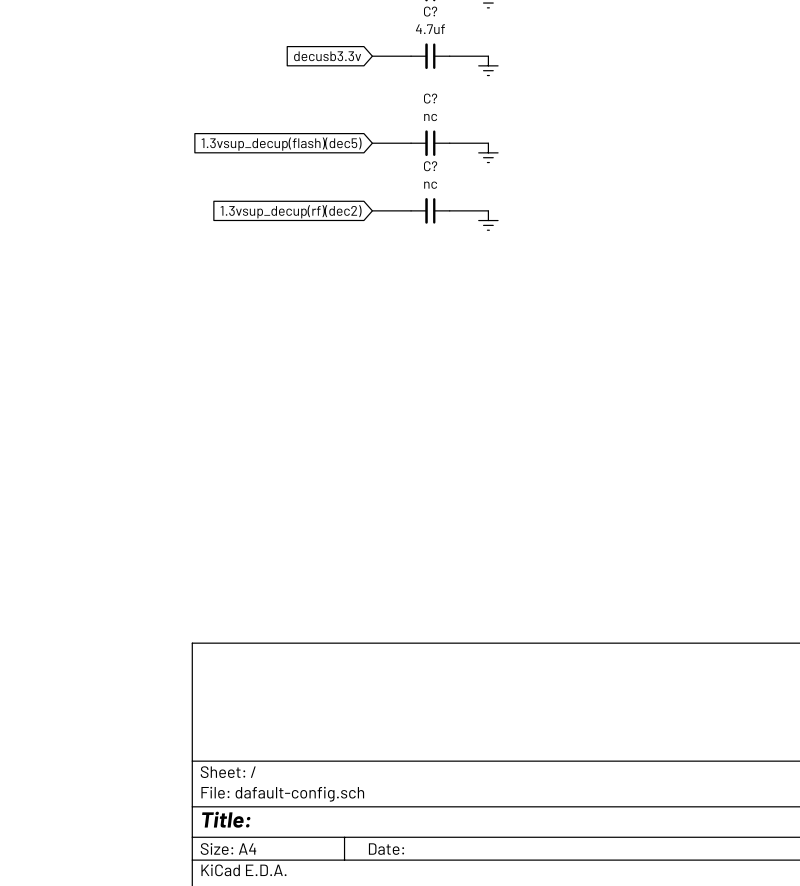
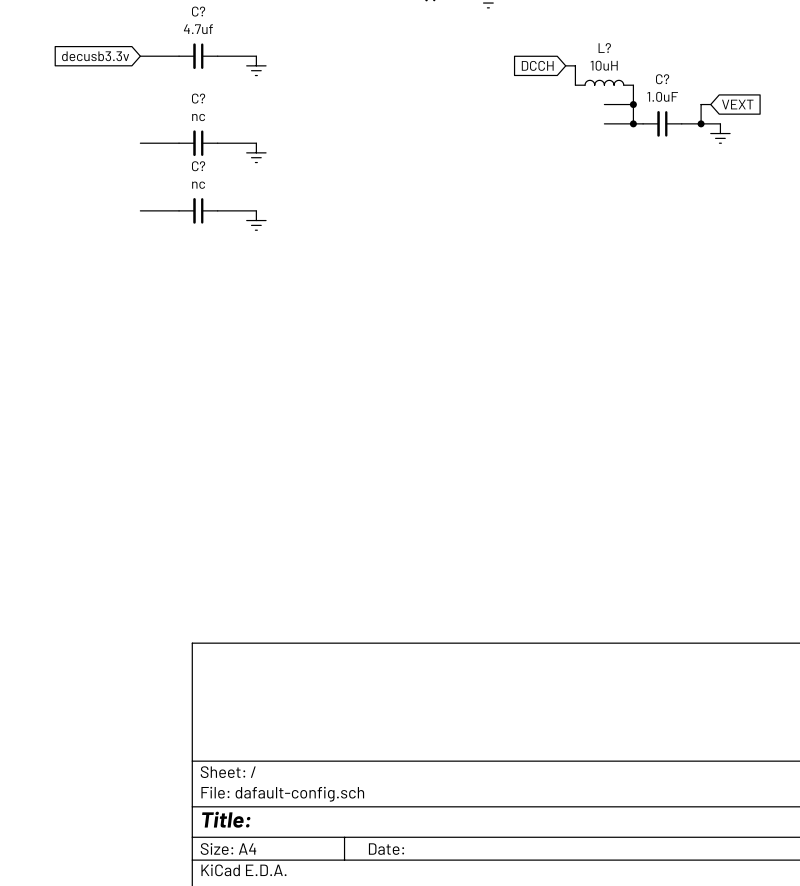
global label: none -> decusb3.3v (95, 56)
wire: none -> (140, 56) (179, 56)
C?: none -> 4.7uf (198, 56)
global label: decusb3.3v (327, 56) -> none
wire: (372, 56) (411, 56) -> (217, 56) (256, 56)
C?: 4.7uf (430, 56) -> none
wire: (449, 56) (488, 56) -> none
power symbol: none -> (256, 65)
power symbol: (488, 65) -> none
global label: none -> DCCH (537, 65)
wire: none -> (565, 65) (575, 65) (575, 85)
L?: none -> 10uH (604, 82)
wire: none -> (633, 85) (633, 123)
wire: none -> (604, 104) (633, 104)
junction: none -> (633, 104)
wire: none -> (710, 104) (701, 104) (701, 123)
global label: none -> VEXT (737, 104)
junction: none -> (633, 123)
C?: none -> 1.0uF (662, 123)
wire: none -> (681, 123) (720, 123)
junction: none -> (701, 123)
power symbol: none -> (720, 133)
wire: none -> (140, 143) (179, 143)
C?: none -> nc (198, 143)
wire: (372, 143) (411, 143) -> (217, 143) (256, 143)
C?: nc (430, 143) -> none
wire: (449, 143) (488, 143) -> (604, 123) (643, 123)
global label: 1.3vsup_decup(flash)(dec5) (281, 144) -> none
power symbol: none -> (256, 152)
power symbol: (488, 152) -> none
wire: none -> (140, 210) (179, 210)
C?: none -> nc (198, 210)
wire: (372, 210) (411, 210) -> (217, 210) (256, 210)
C?: nc (430, 210) -> none
wire: (449, 210) (488, 210) -> none
global label: 1.3vsup_decup(rf)(dec2) (291, 211) -> none
power symbol: none -> (256, 220)
power symbol: (488, 220) -> none

